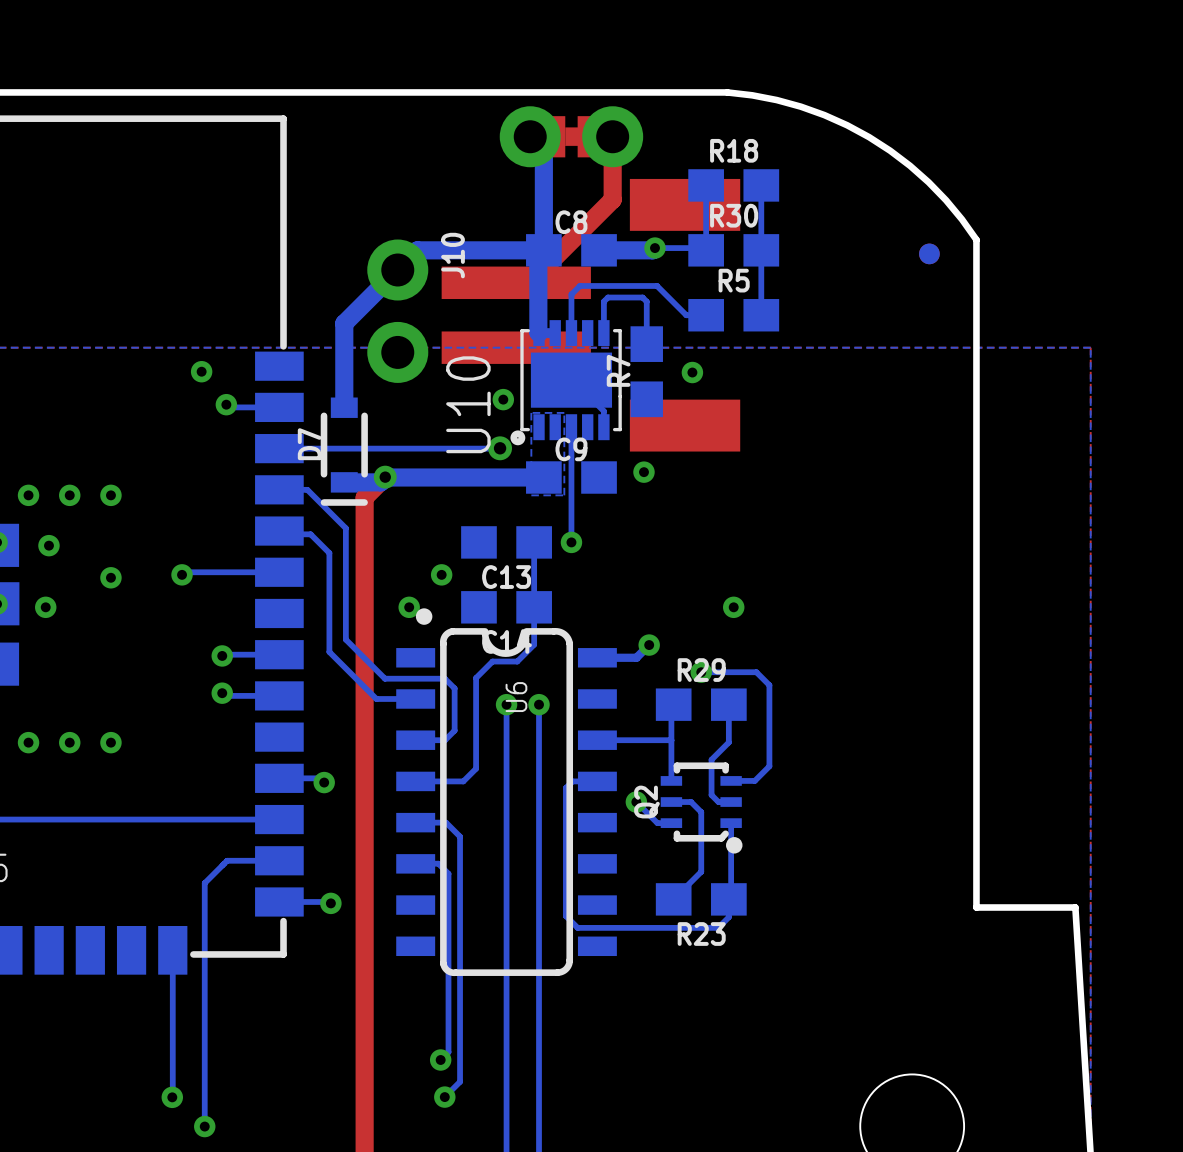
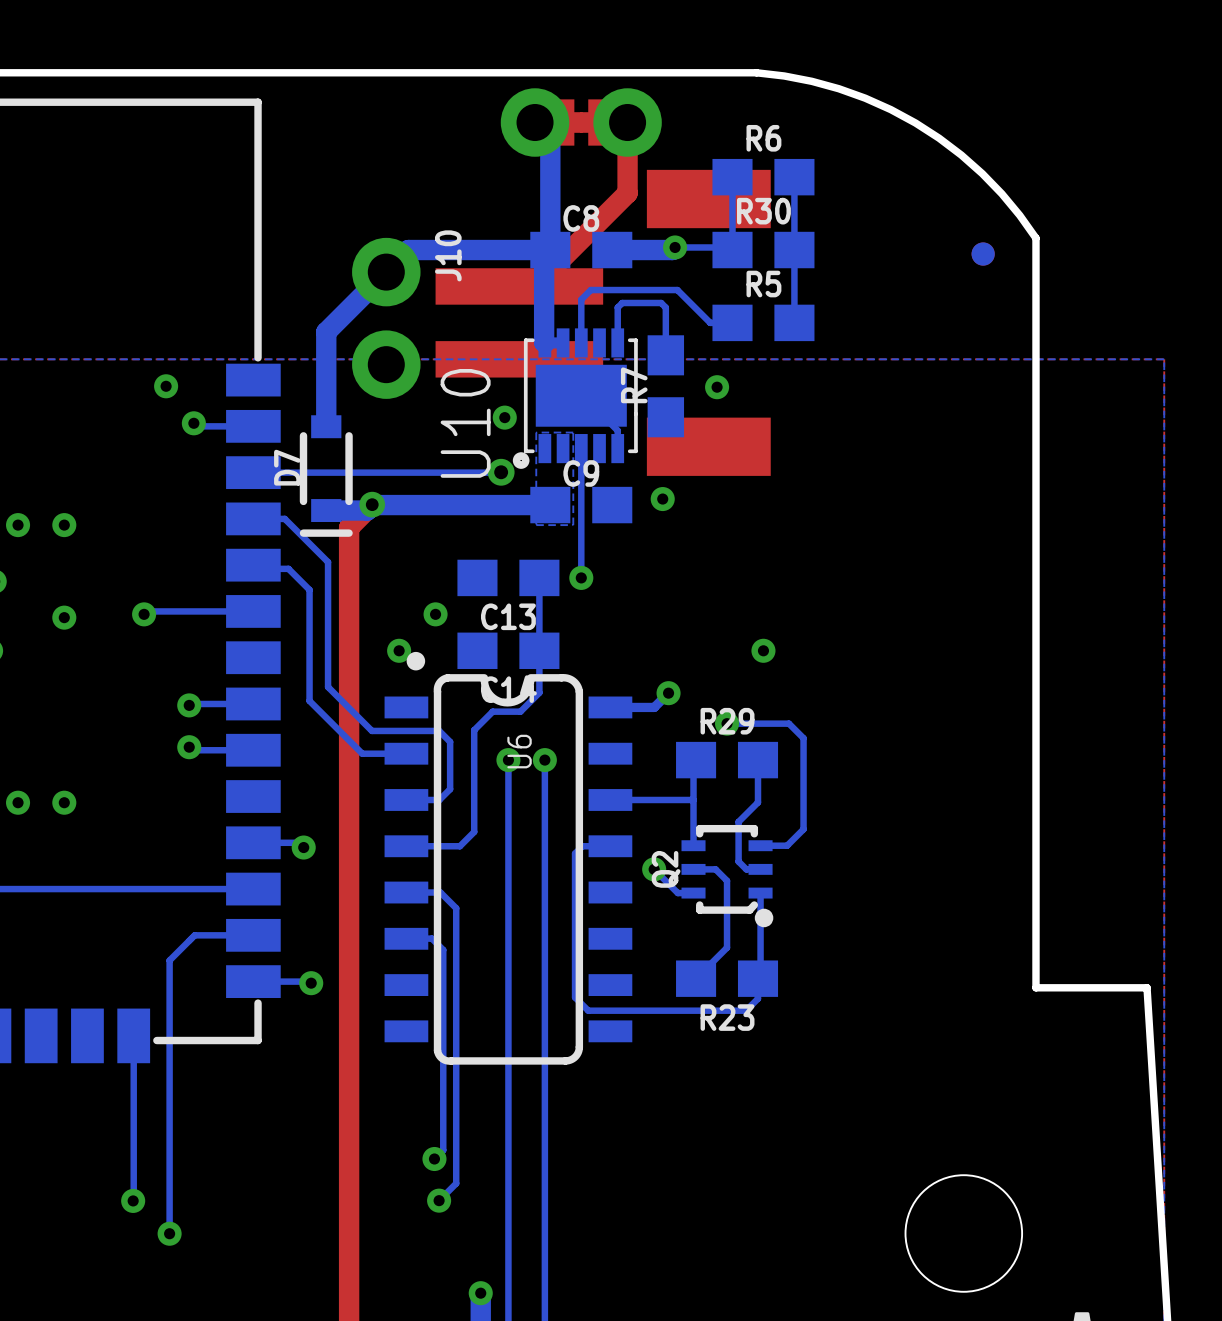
part footprint: [499, 106, 644, 168] -> [500, 88, 662, 157]
R18 name: R18 (734, 150) -> R6 (763, 138)

